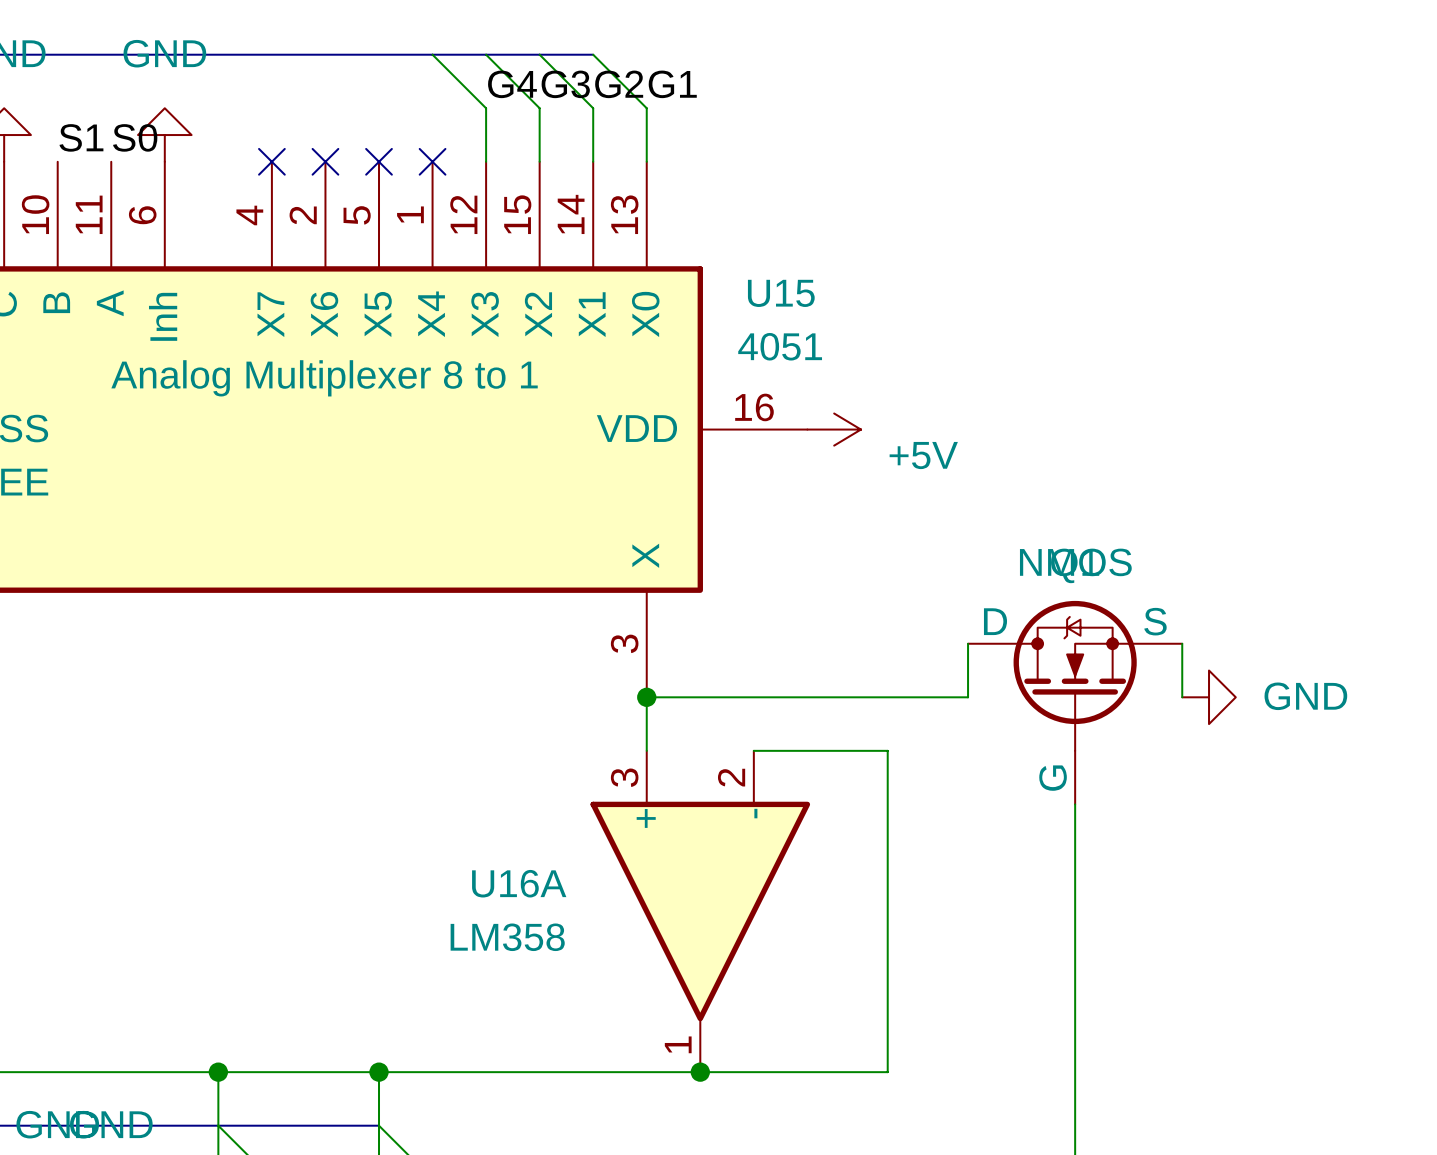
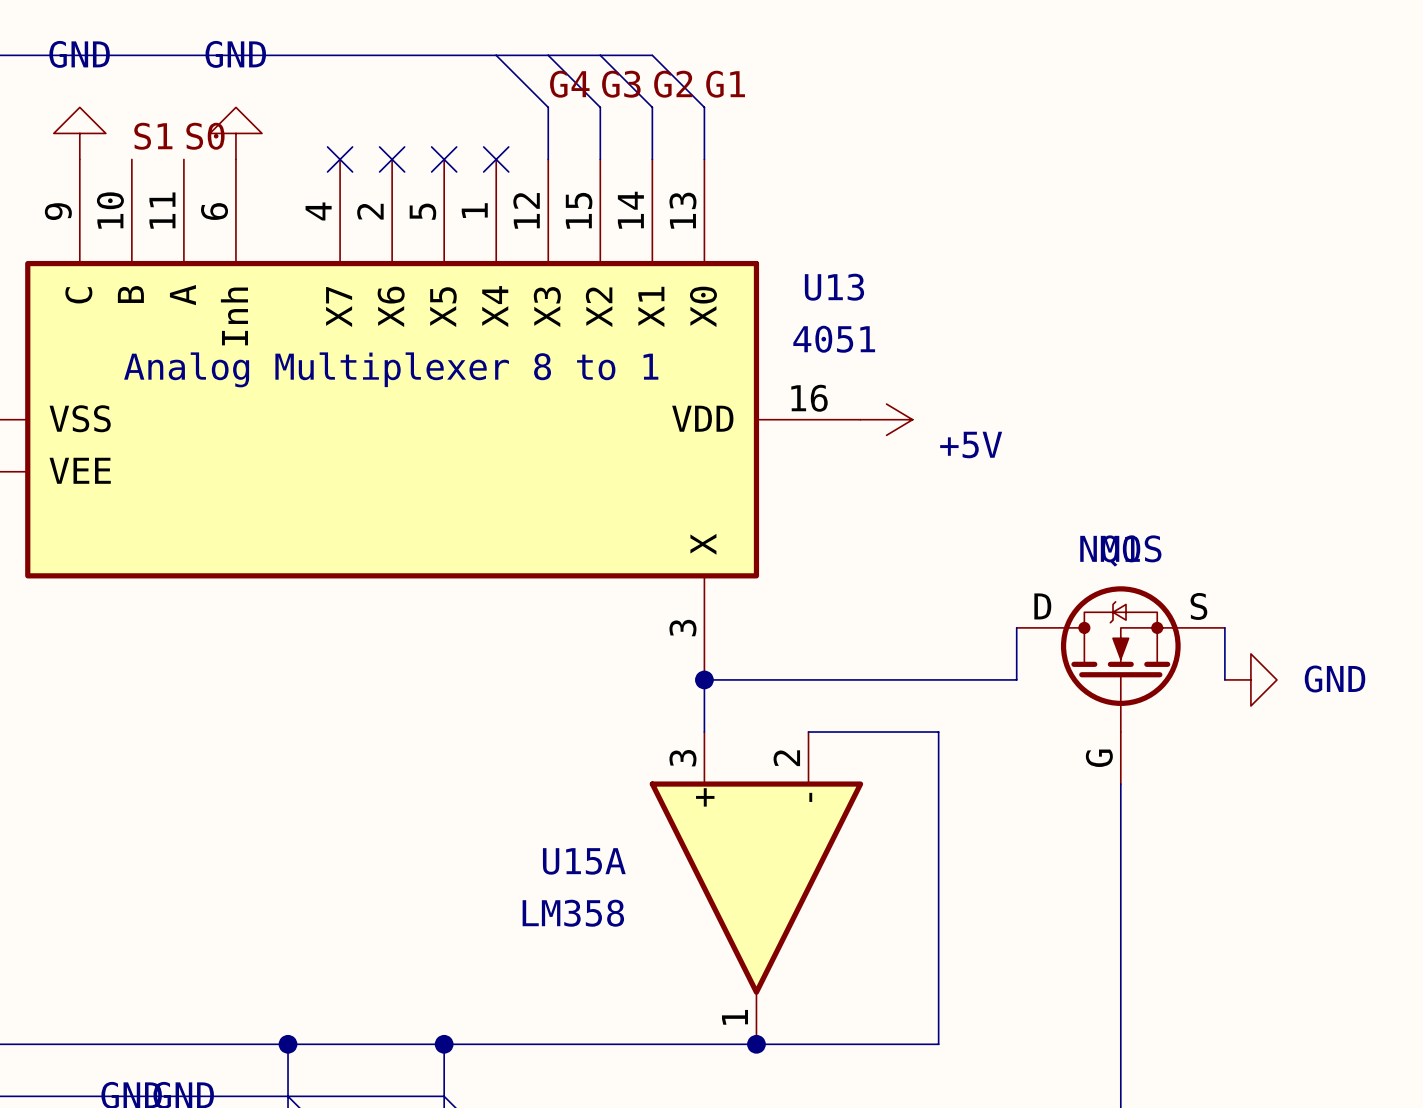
U15 name: U15 (781, 293) -> U13 (834, 287)
U16A name: U16A (519, 883) -> U15A (584, 861)

